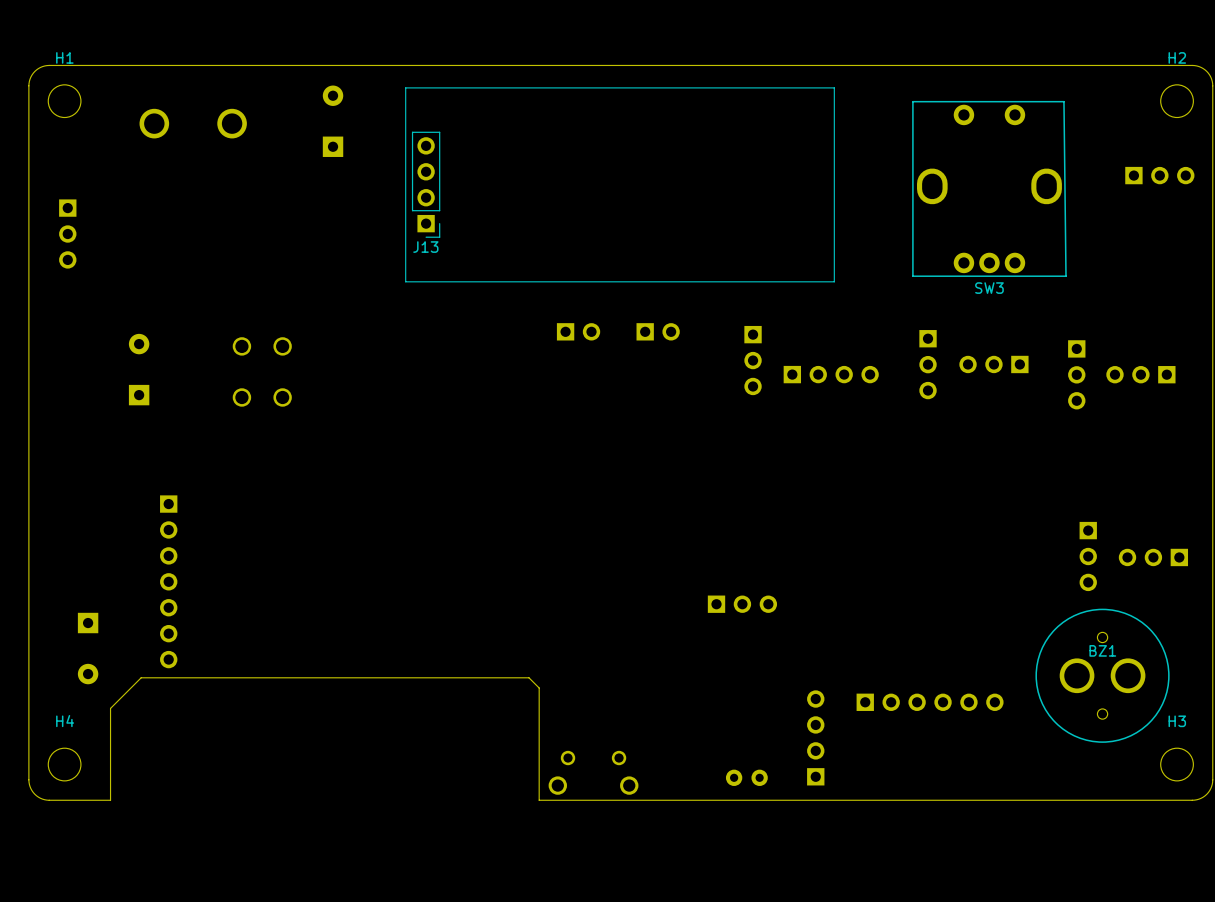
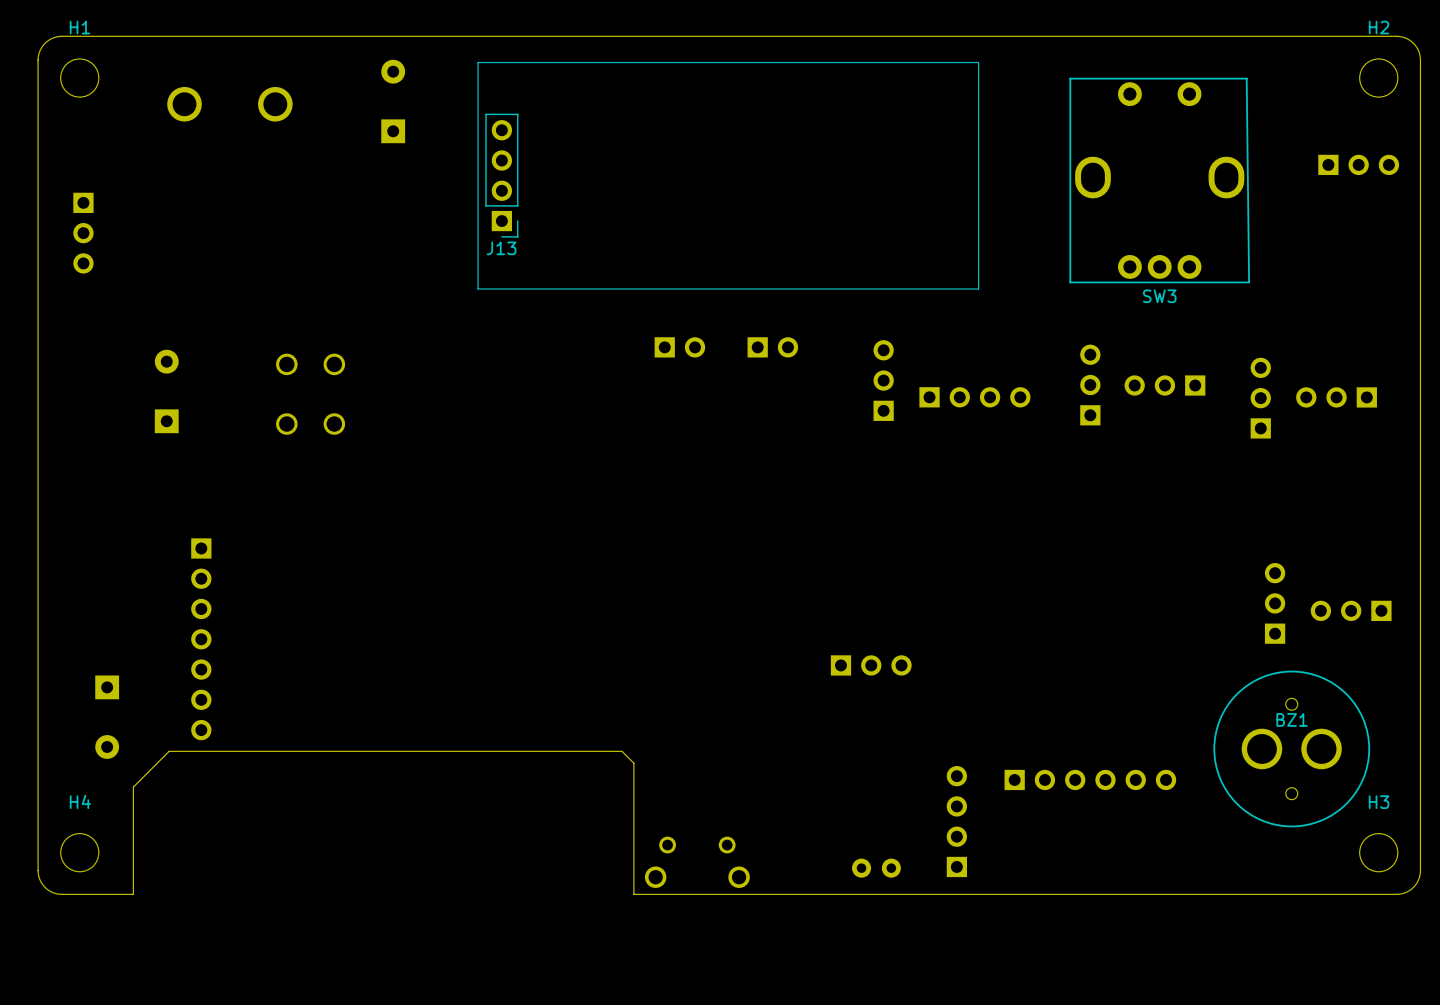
part rotation: 0° (753, 360) -> 180° (883, 380)
part rotation: 0° (928, 364) -> 180° (1090, 385)
part rotation: 0° (1076, 374) -> 180° (1260, 398)
part rotation: 0° (1088, 556) -> 180° (1275, 603)

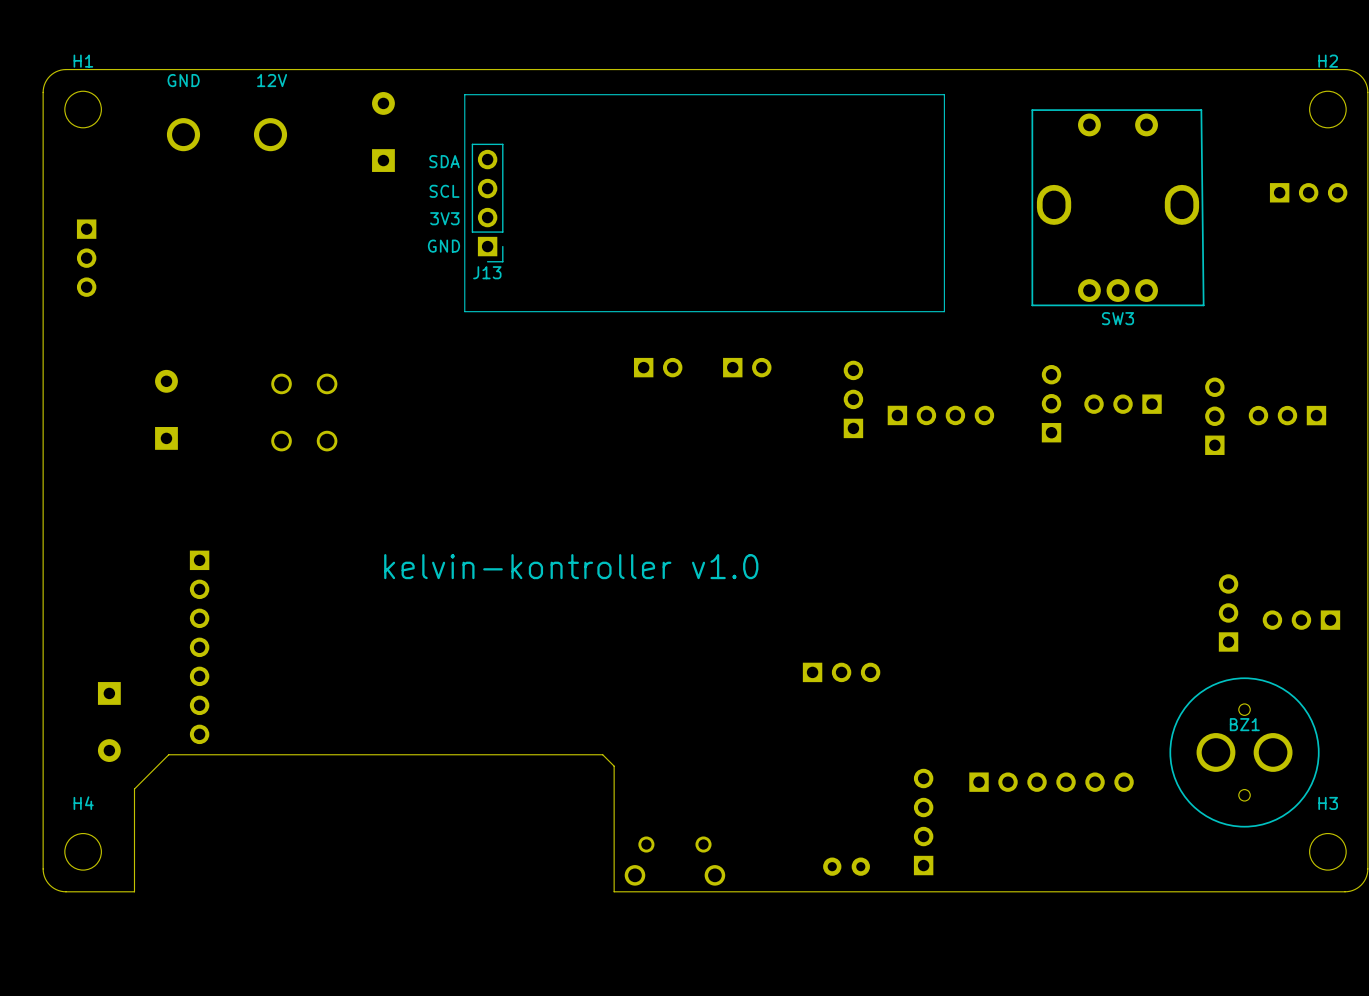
text: none -> GND (183, 80)
text: none -> 12V (272, 80)
text: none -> SDA (444, 161)
text: none -> SCL (444, 191)
text: none -> 3V3 (444, 218)
text: none -> GND (443, 246)
text: none -> kelvin-kontroller v1.0 (571, 566)

